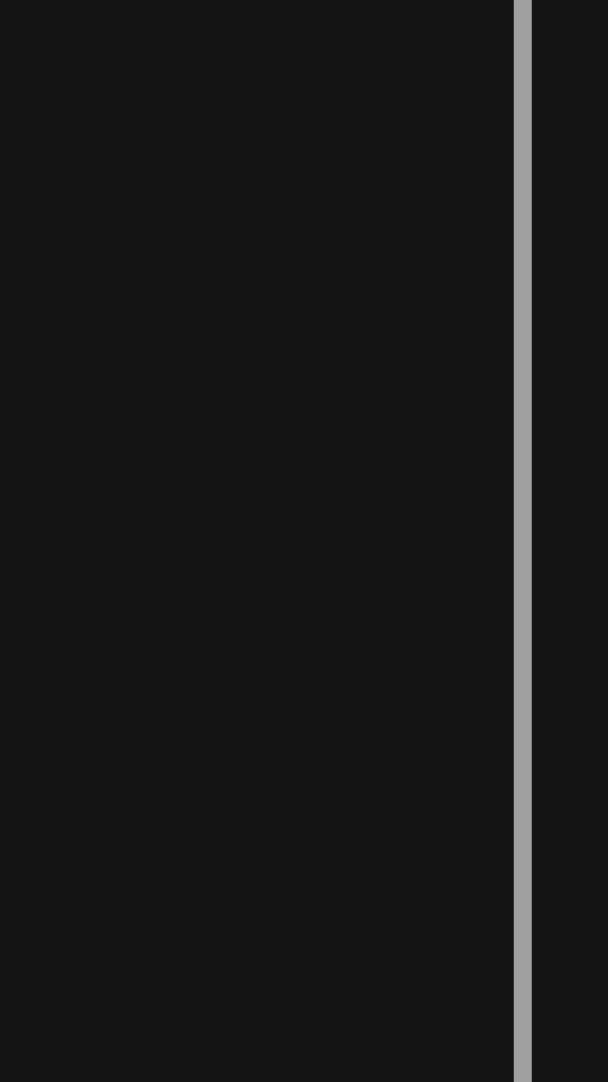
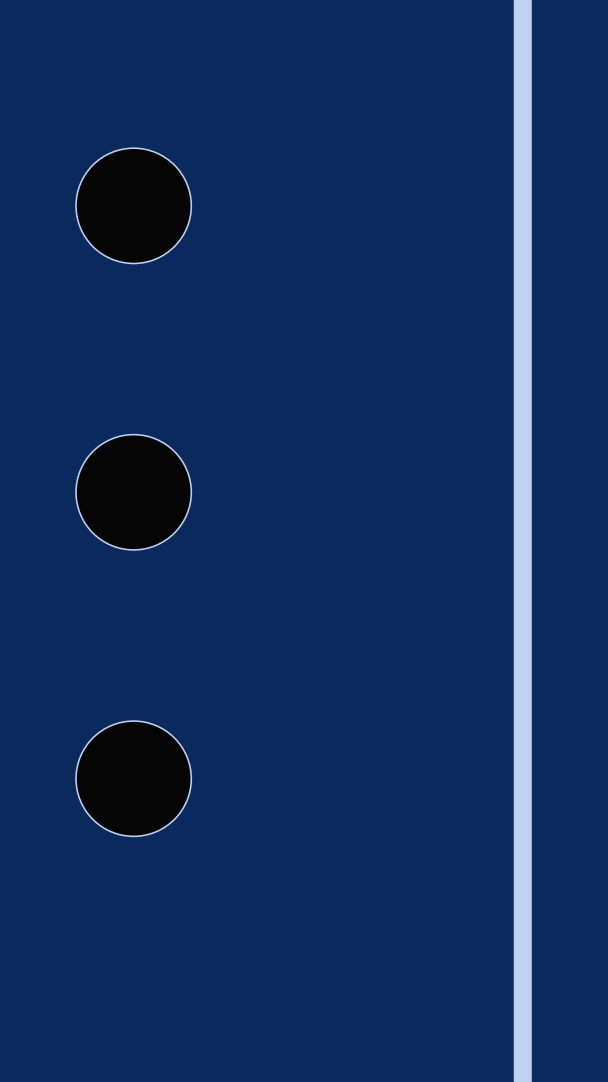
part: none -> (133, 205)
part: none -> (133, 492)
part: none -> (133, 778)

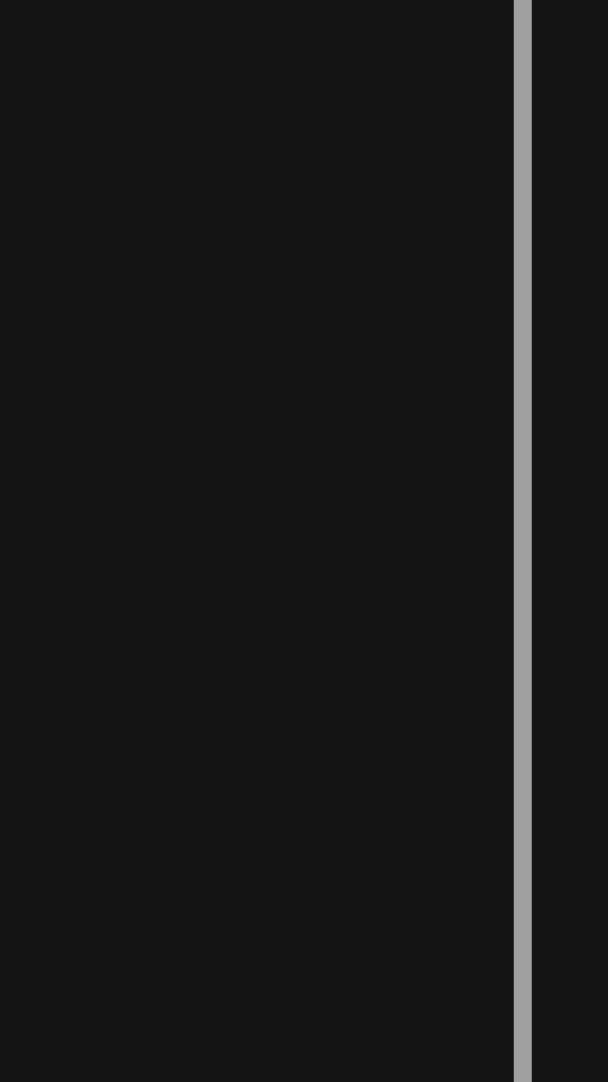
part: (133, 205) -> none
part: (133, 492) -> none
part: (133, 778) -> none

